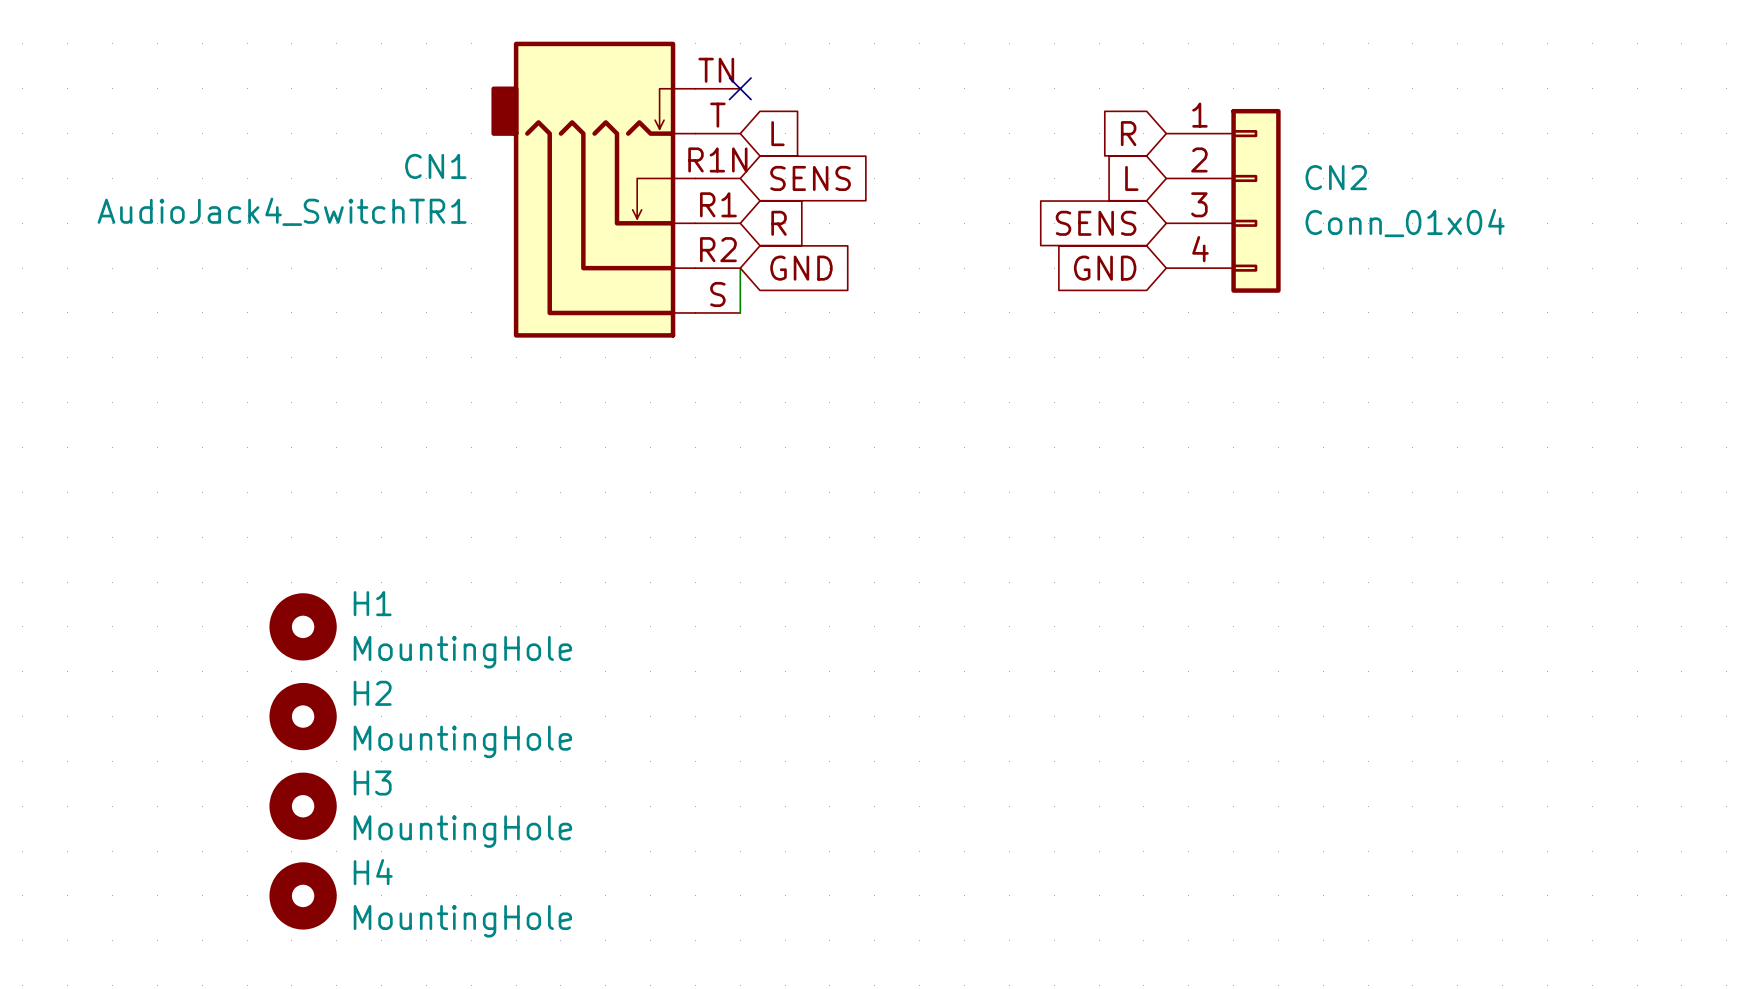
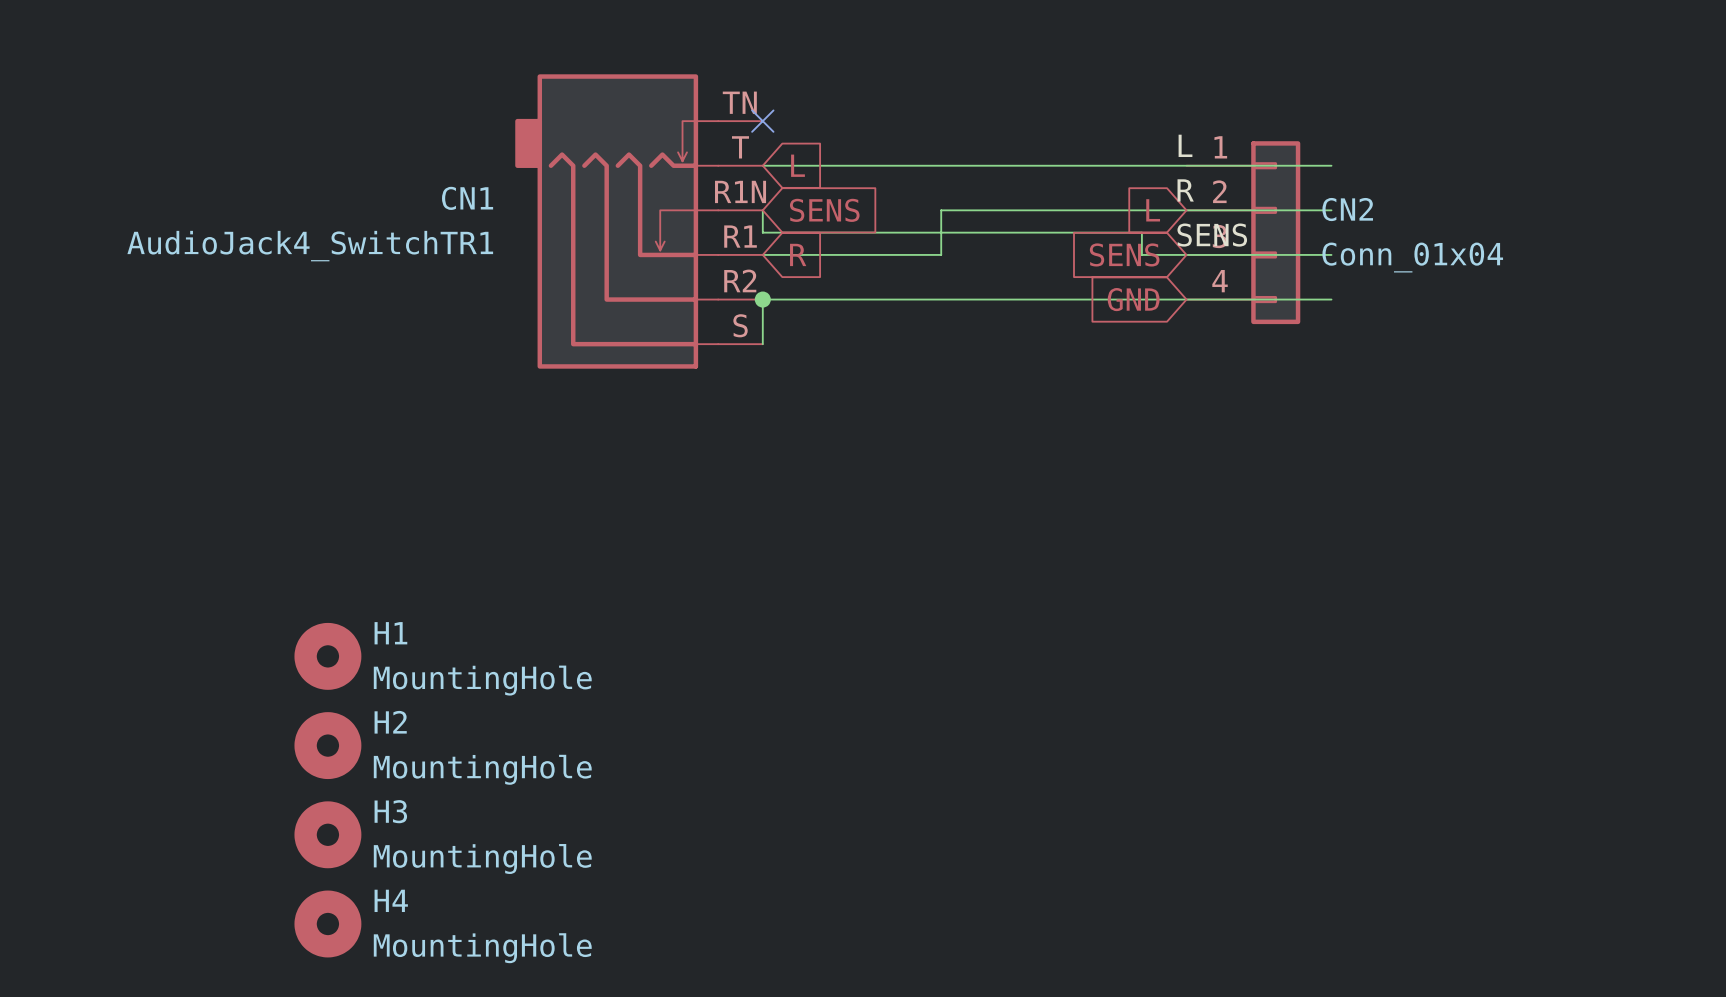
label: none -> L (1185, 145)
wire: none -> (762, 165) (1331, 165)
global label: R (1128, 133) -> none
label: none -> R (1185, 190)
wire: none -> (762, 210) (762, 232) (1141, 232) (1141, 254) (1331, 254)
wire: none -> (1331, 210) (941, 210) (941, 254) (762, 254)
label: none -> SENS (1212, 235)
wire: none -> (762, 299) (1331, 299)
junction: none -> (762, 299)
global label: GND (801, 268) -> none

